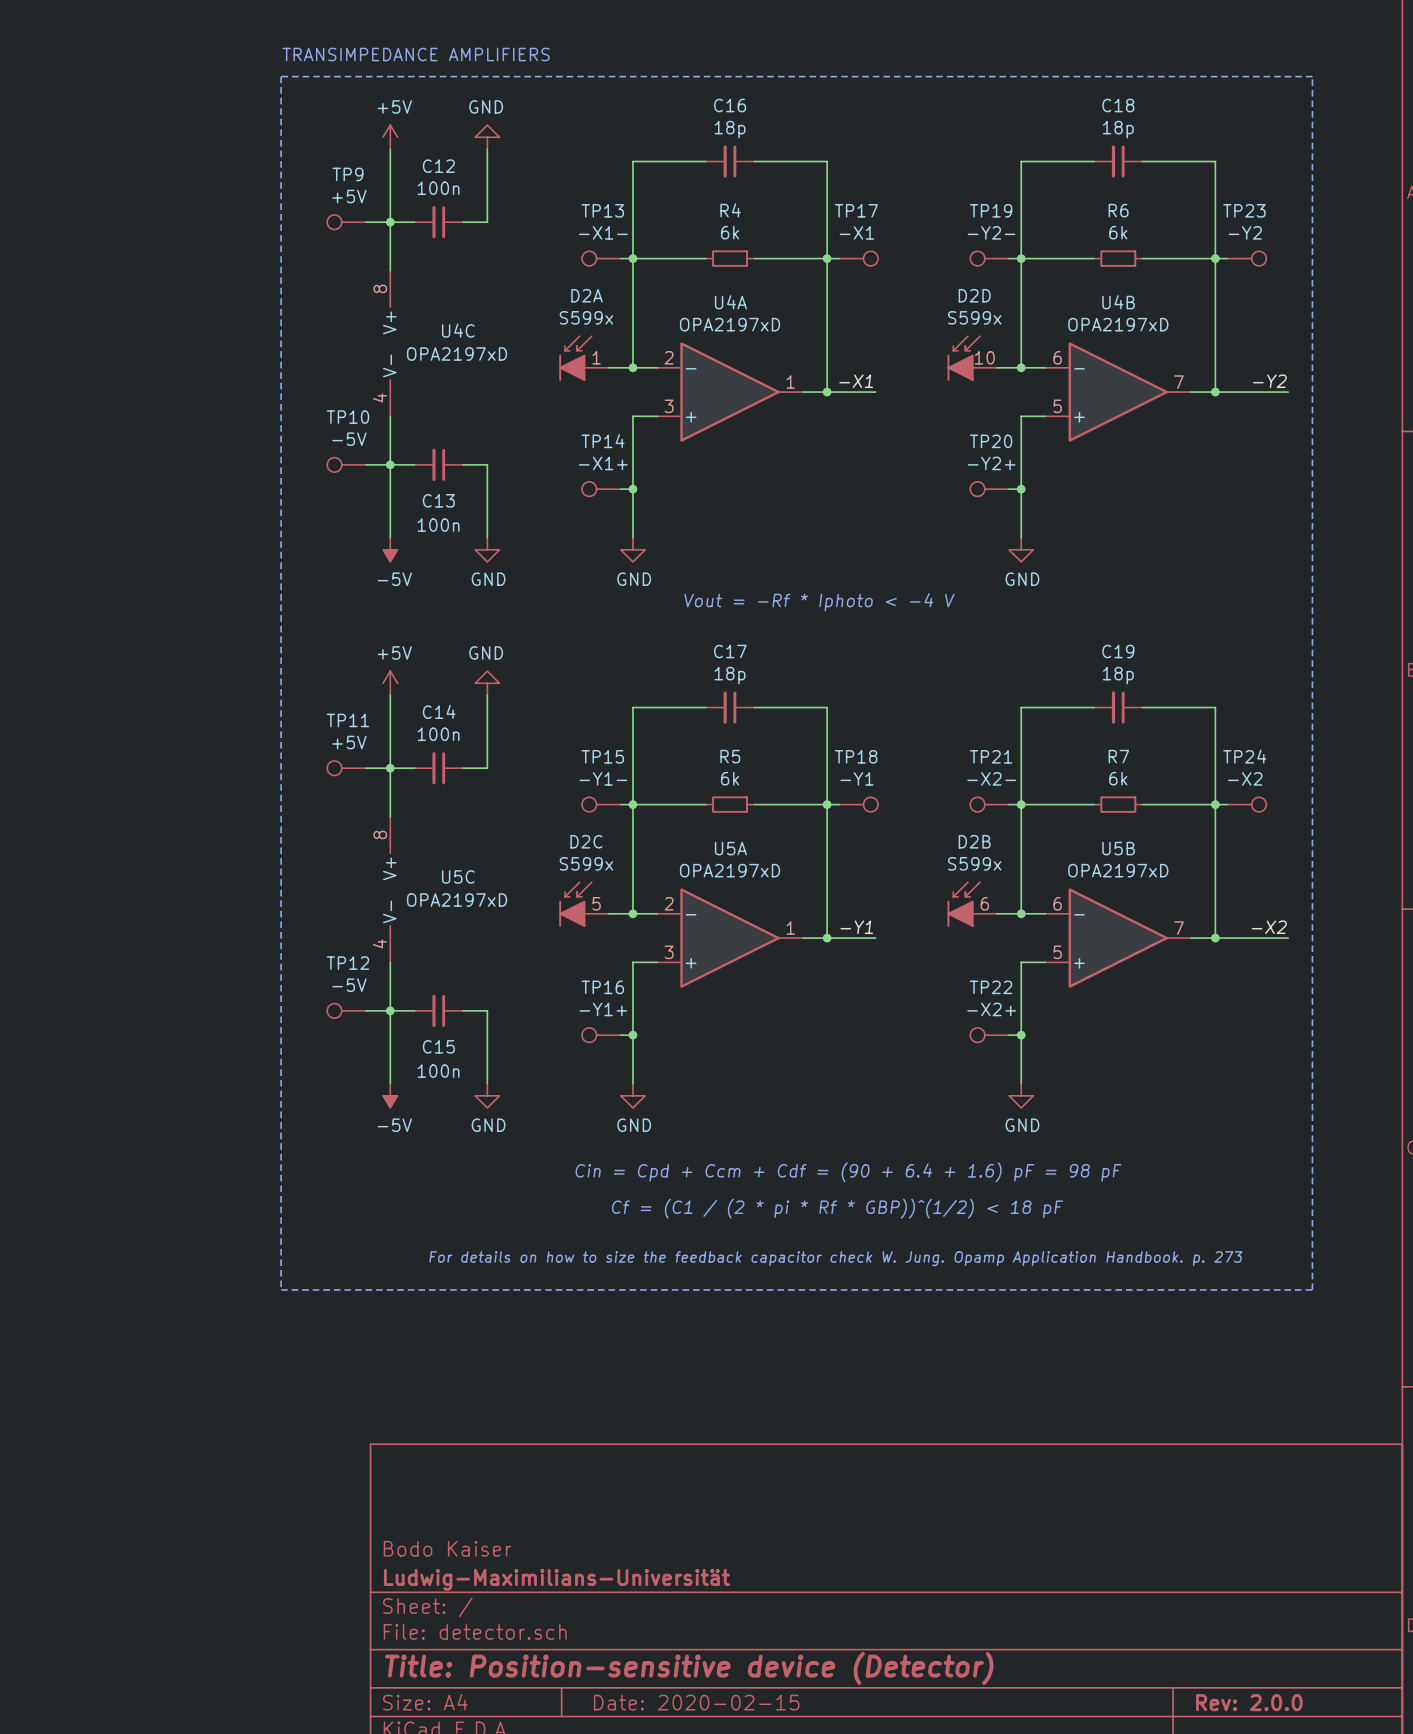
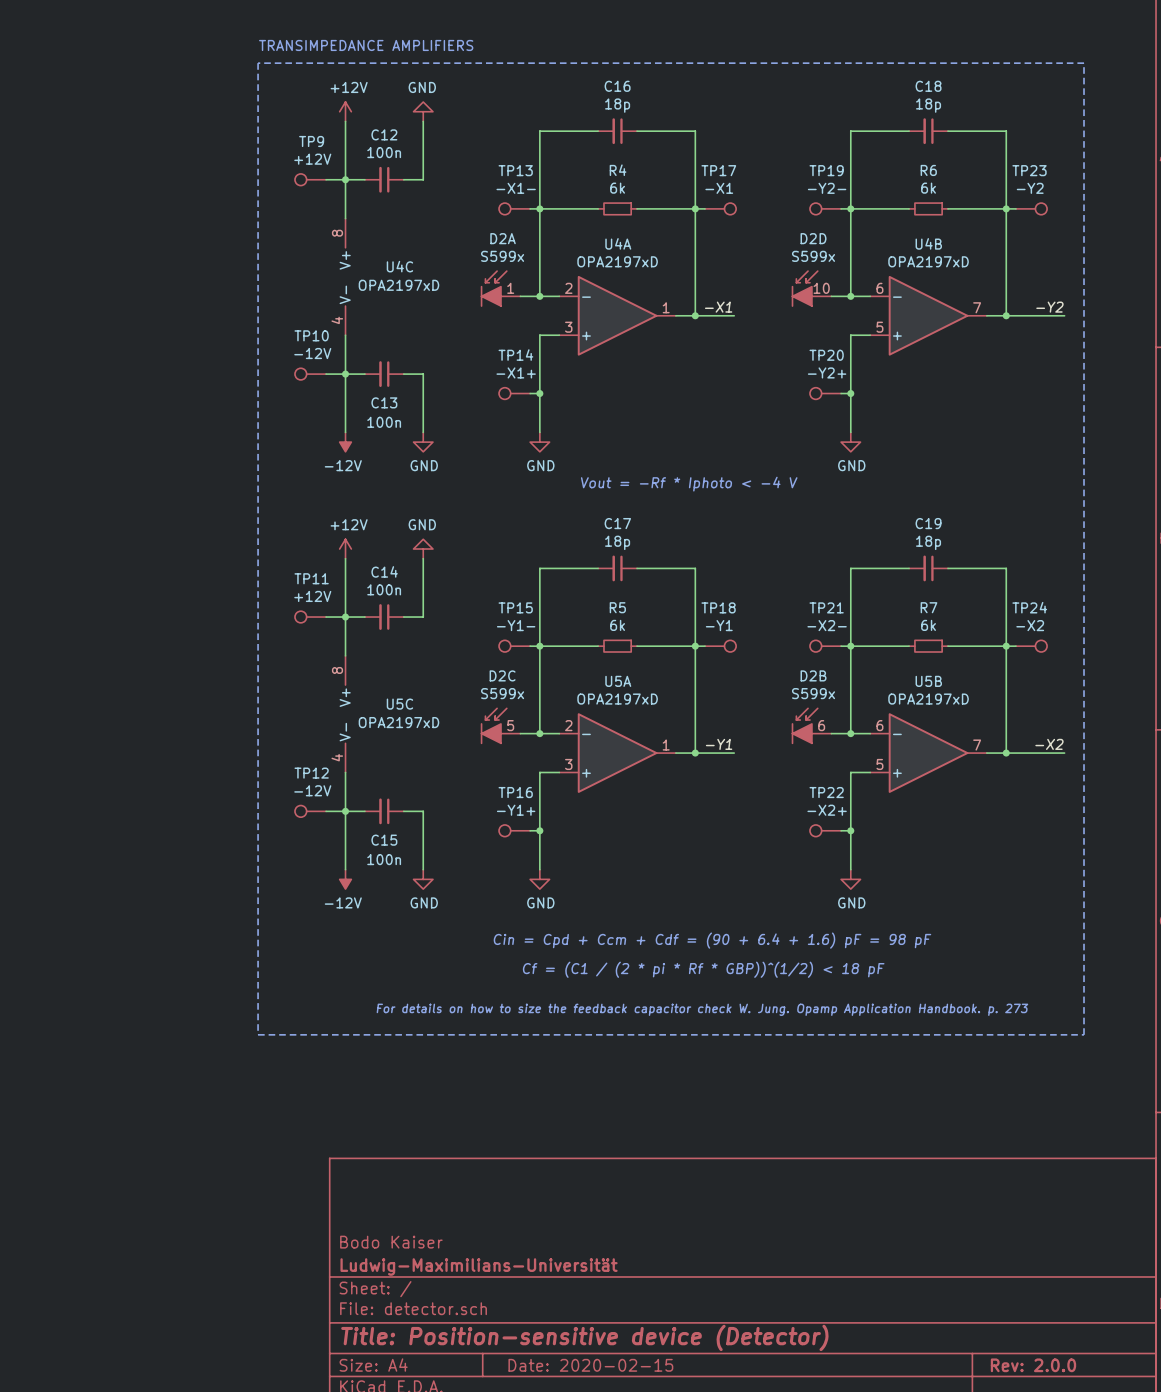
power symbol: +5V (390, 137) -> +12V (345, 111)
TP9 value: +5V (349, 196) -> +12V (312, 159)
TP10 value: -5V (349, 439) -> -12V (312, 353)
power symbol: -5V (390, 549) -> -12V (345, 442)
power symbol: +5V (390, 683) -> +12V (345, 549)
TP11 value: +5V (349, 742) -> +12V (312, 596)
TP12 value: -5V (349, 985) -> -12V (312, 790)
power symbol: -5V (390, 1095) -> -12V (345, 879)

